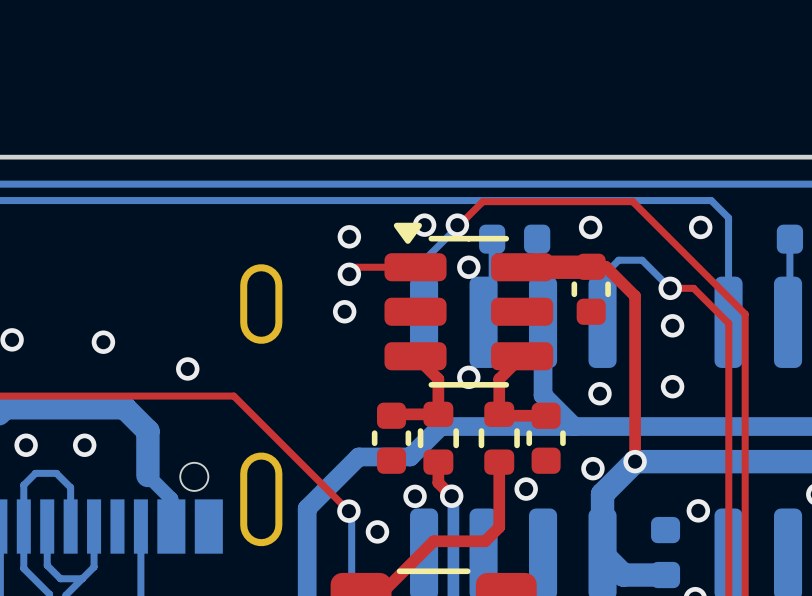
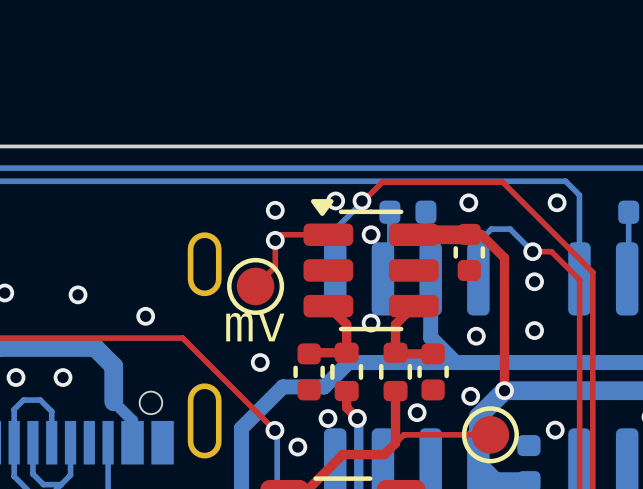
top track: none -> (275, 240) (275, 266) (255, 286)
via position: (344, 311) -> (260, 362)
part: none -> (255, 286)
top track: none -> (490, 434) (403, 434) (395, 443)
part: none -> (490, 434)

